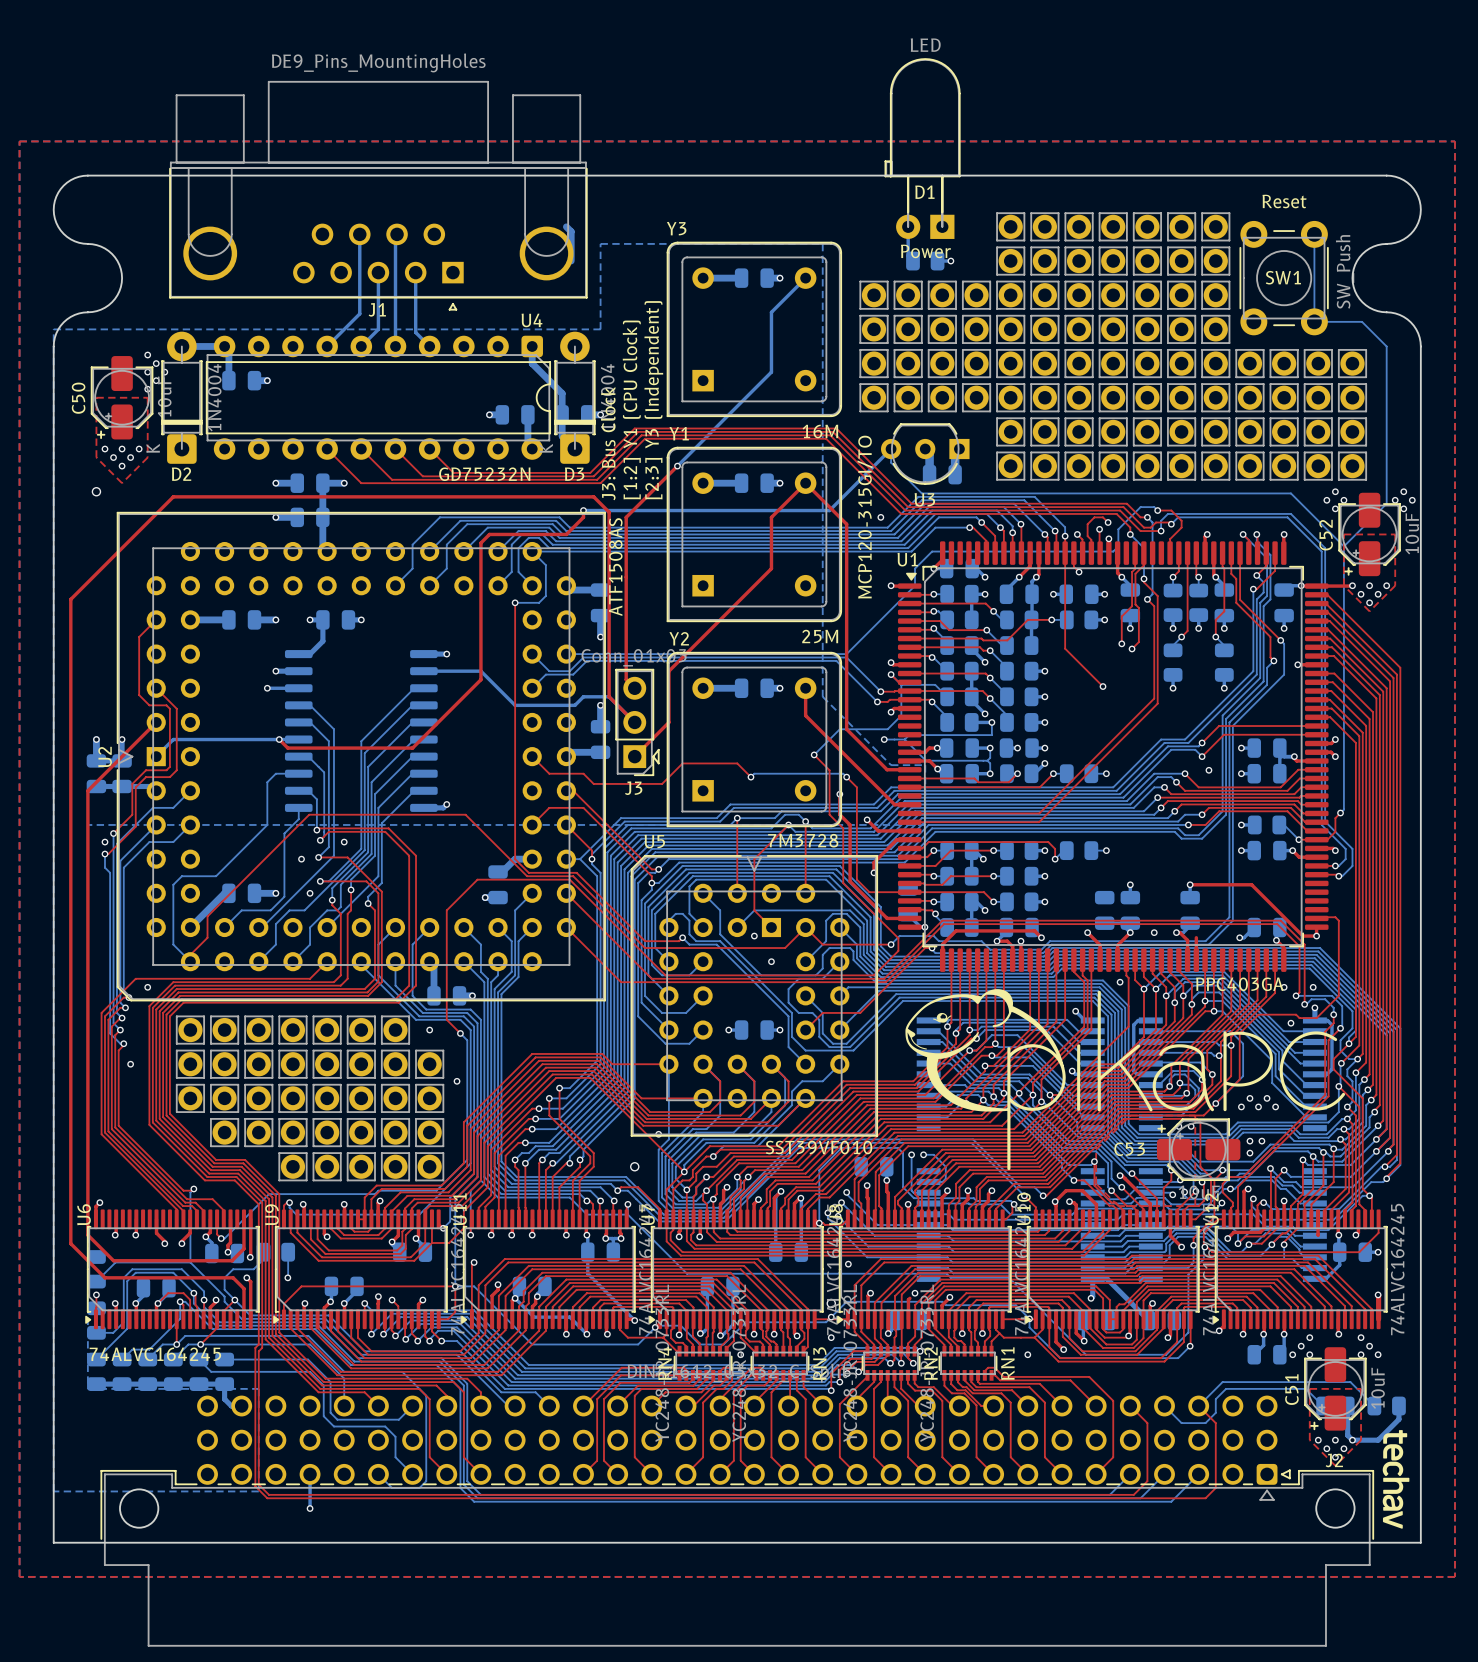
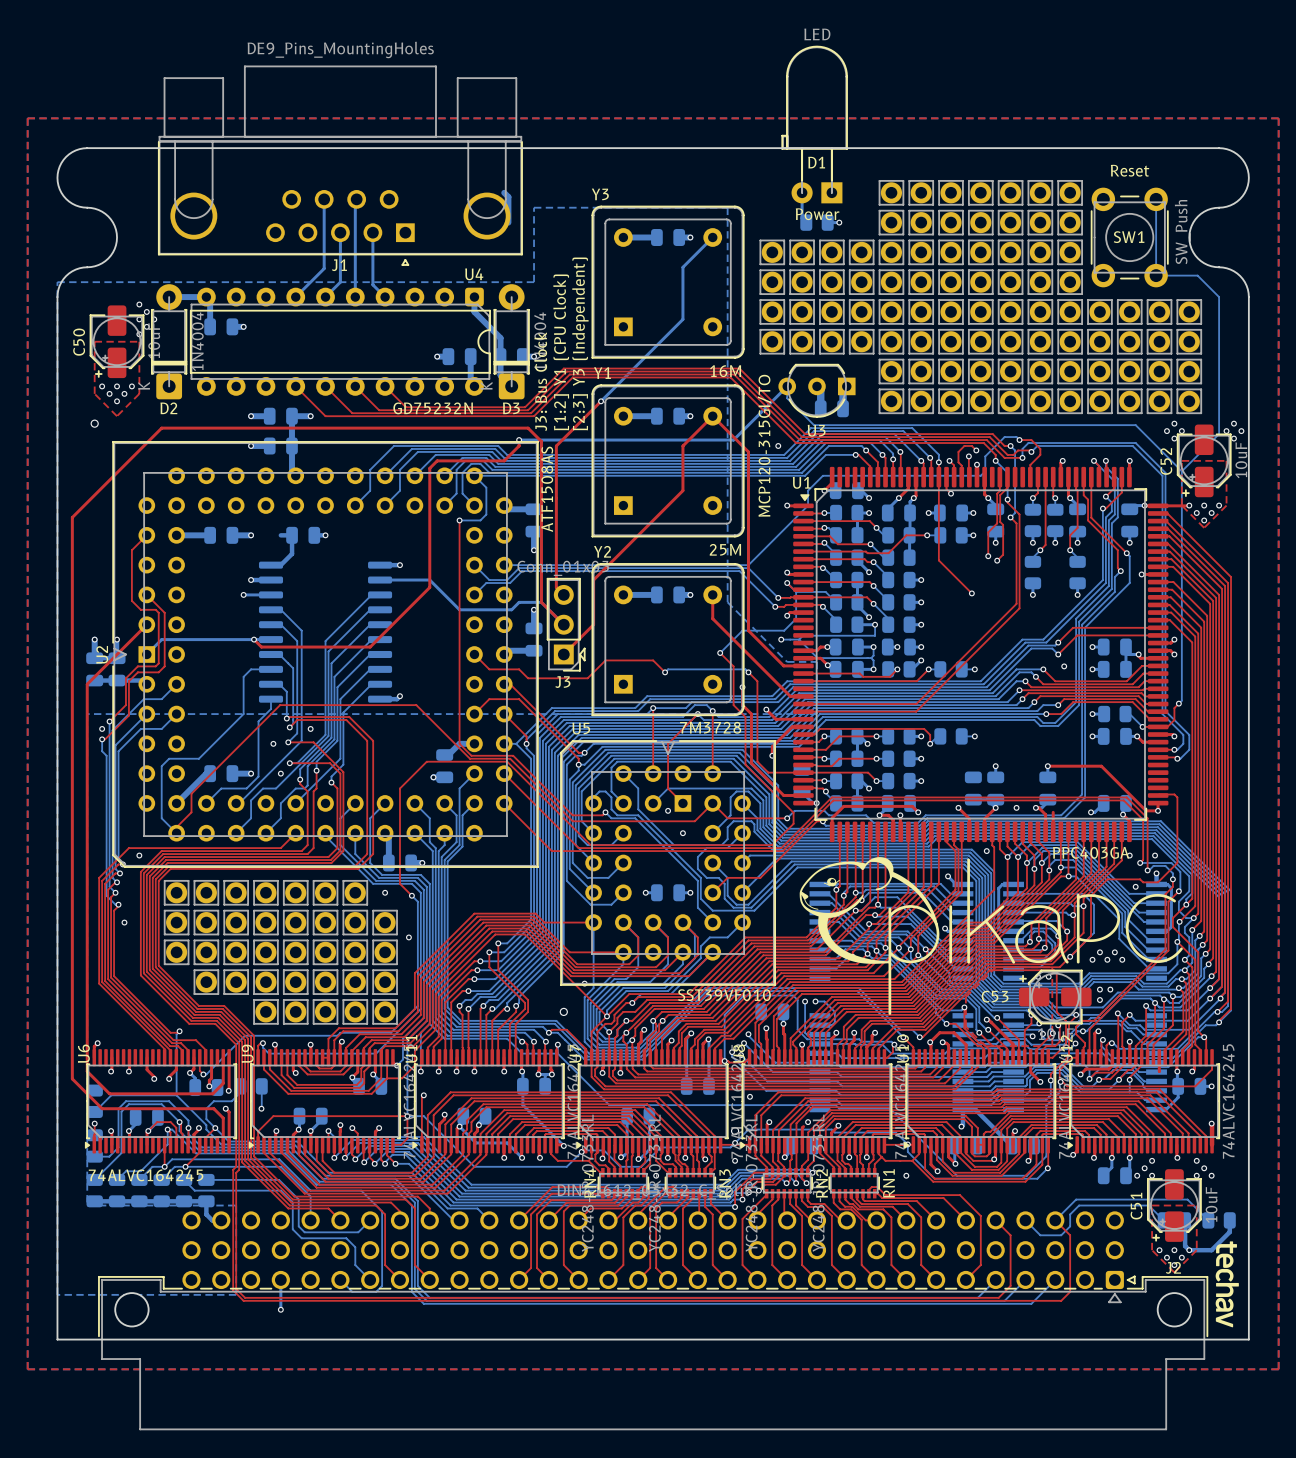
via: (310, 619) -> none

